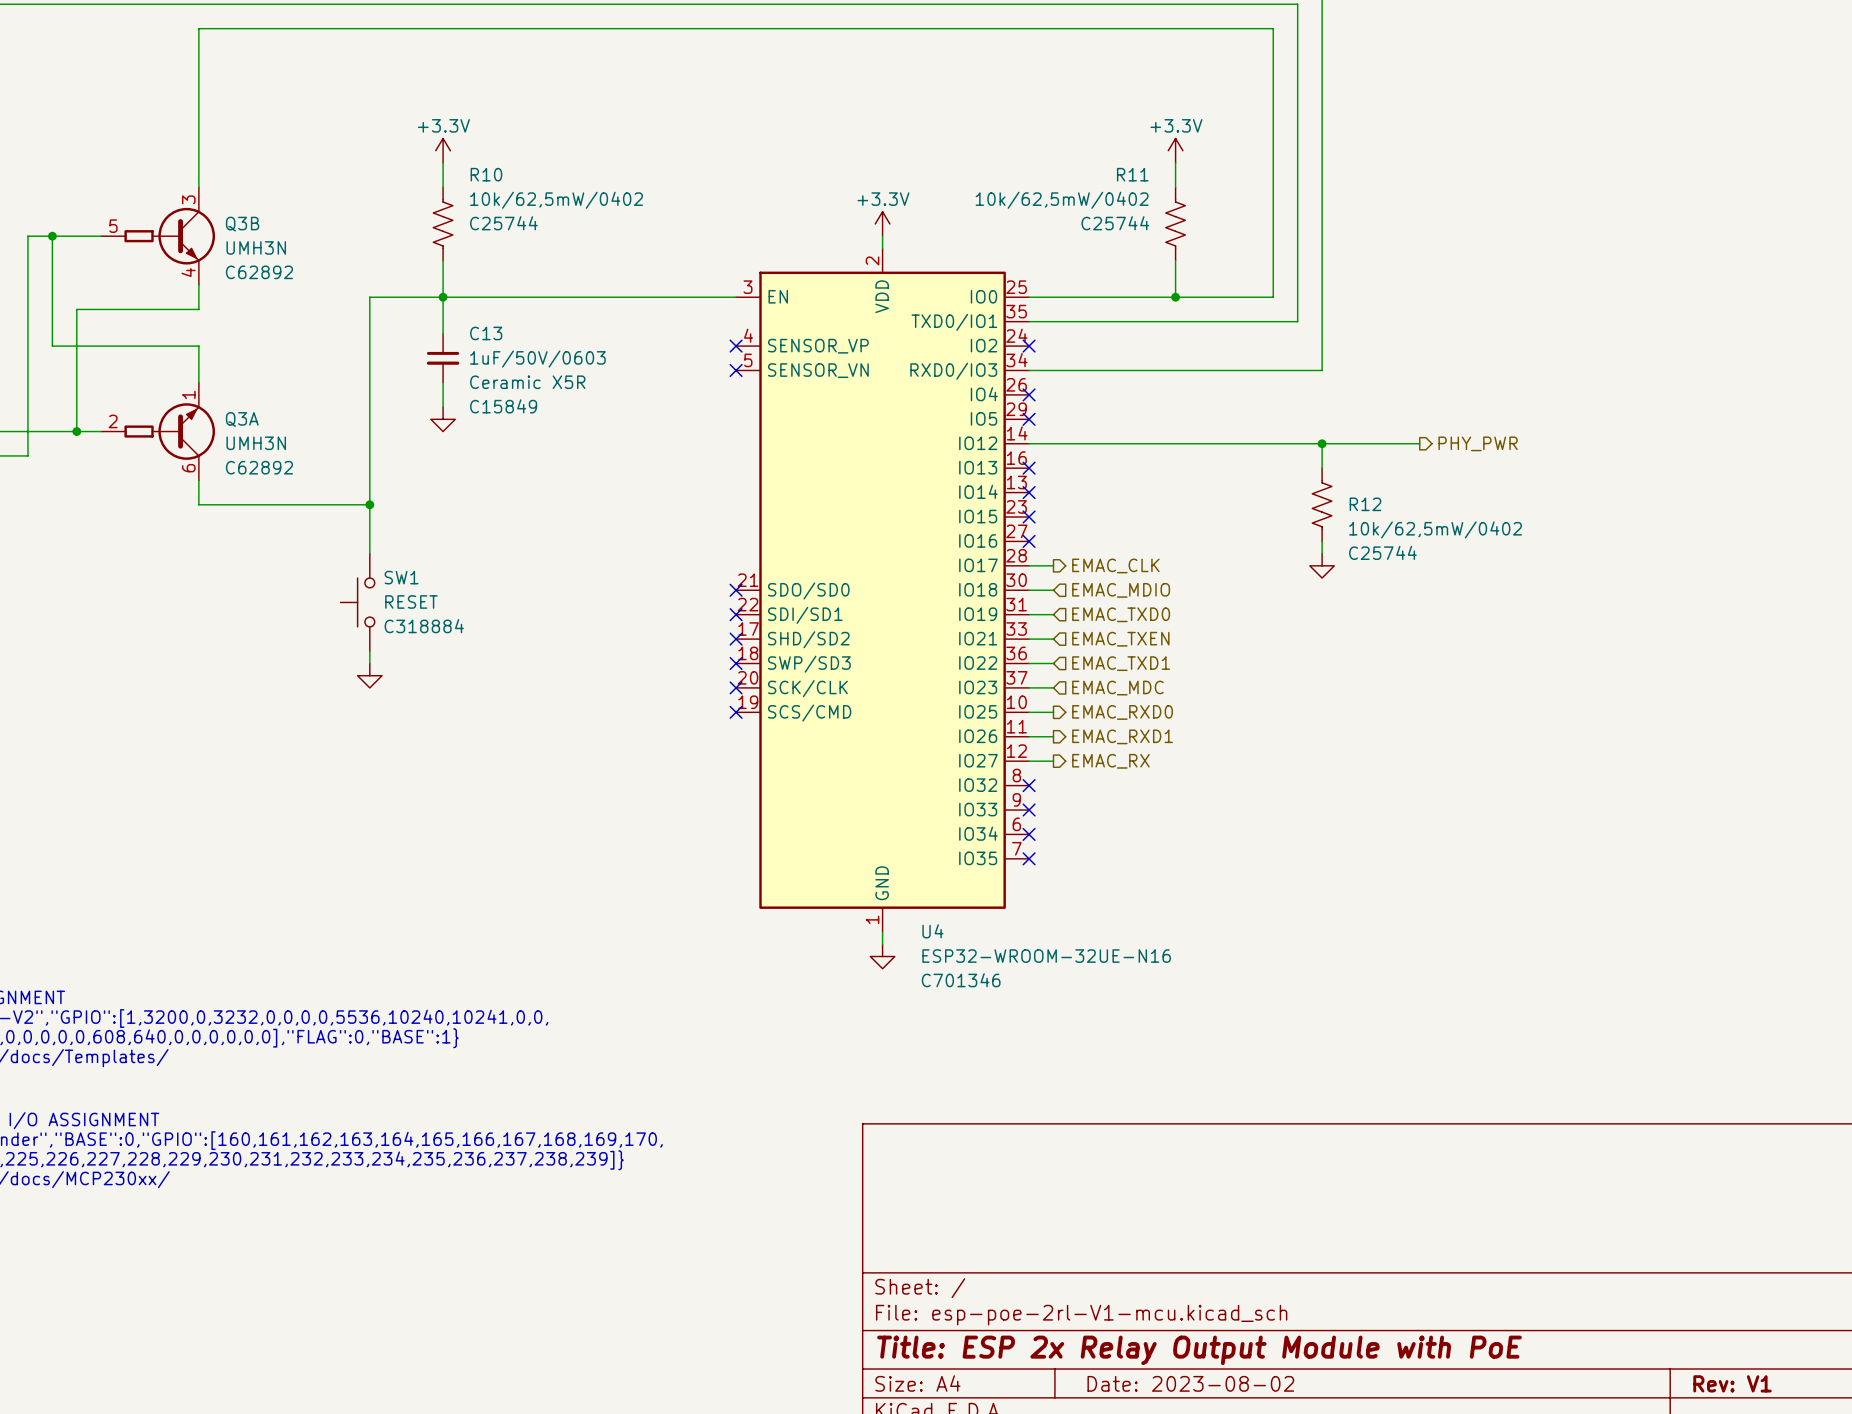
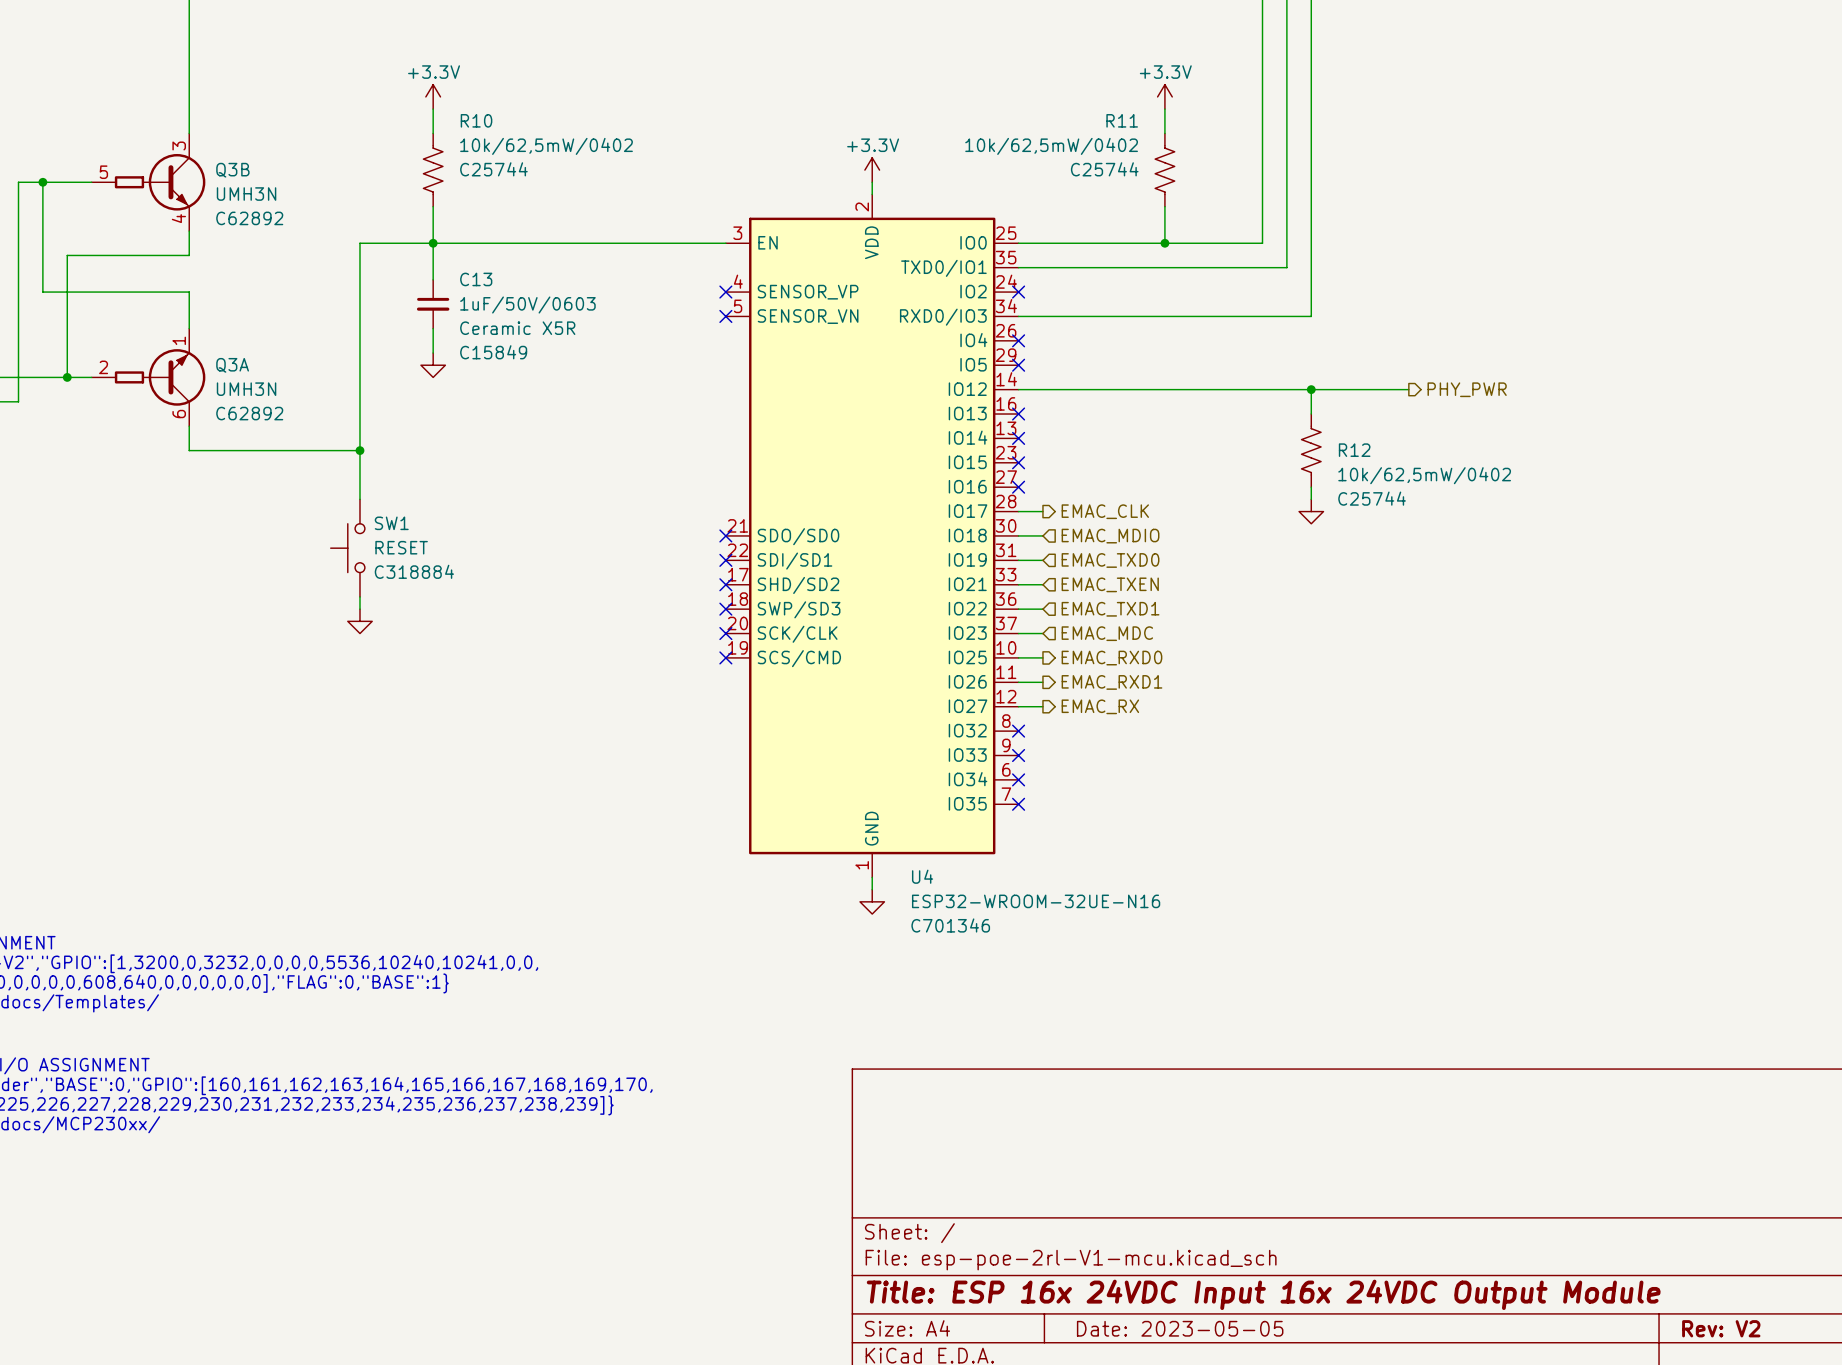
title block: Title: ESP 2x Relay Output Module with PoE (1199, 1350) -> Title: ESP 16x 24VDC Input 16x 24VDC Output Module (1263, 1294)
title block: Date: 2023-08-02 (1190, 1383) -> Date: 2023-05-05 (1180, 1328)
title block: Rev: V1 (1732, 1383) -> Rev: V2 (1721, 1328)

